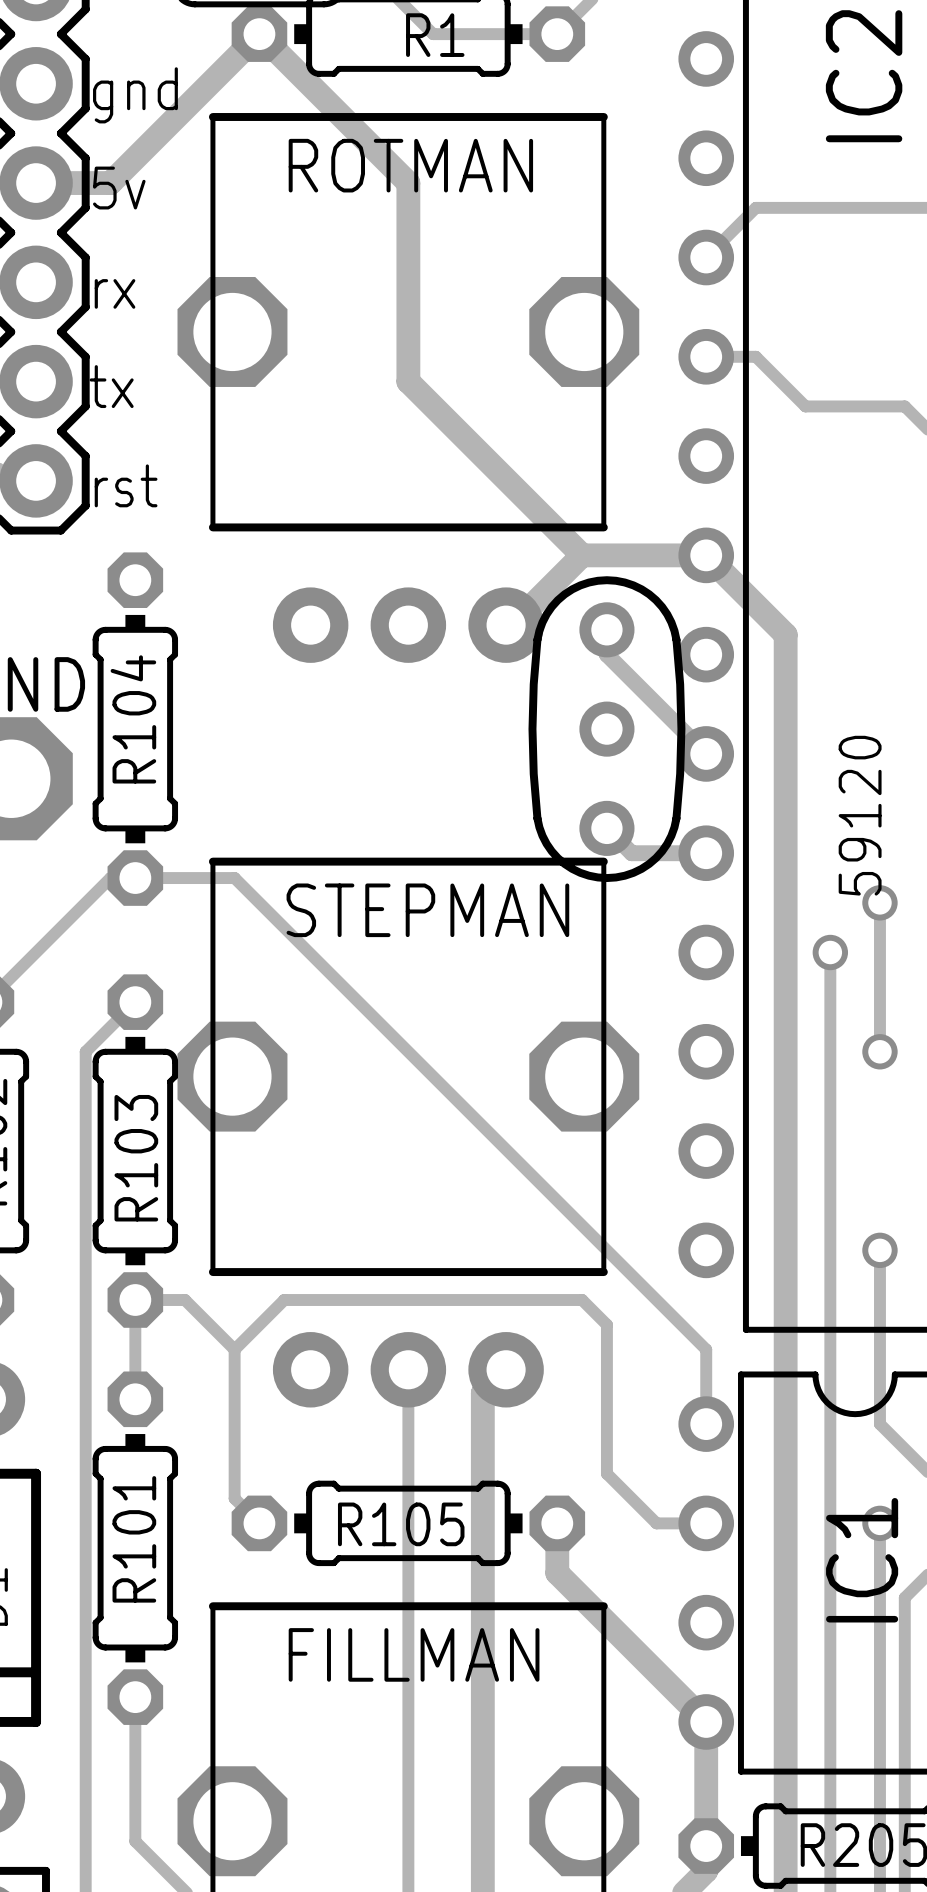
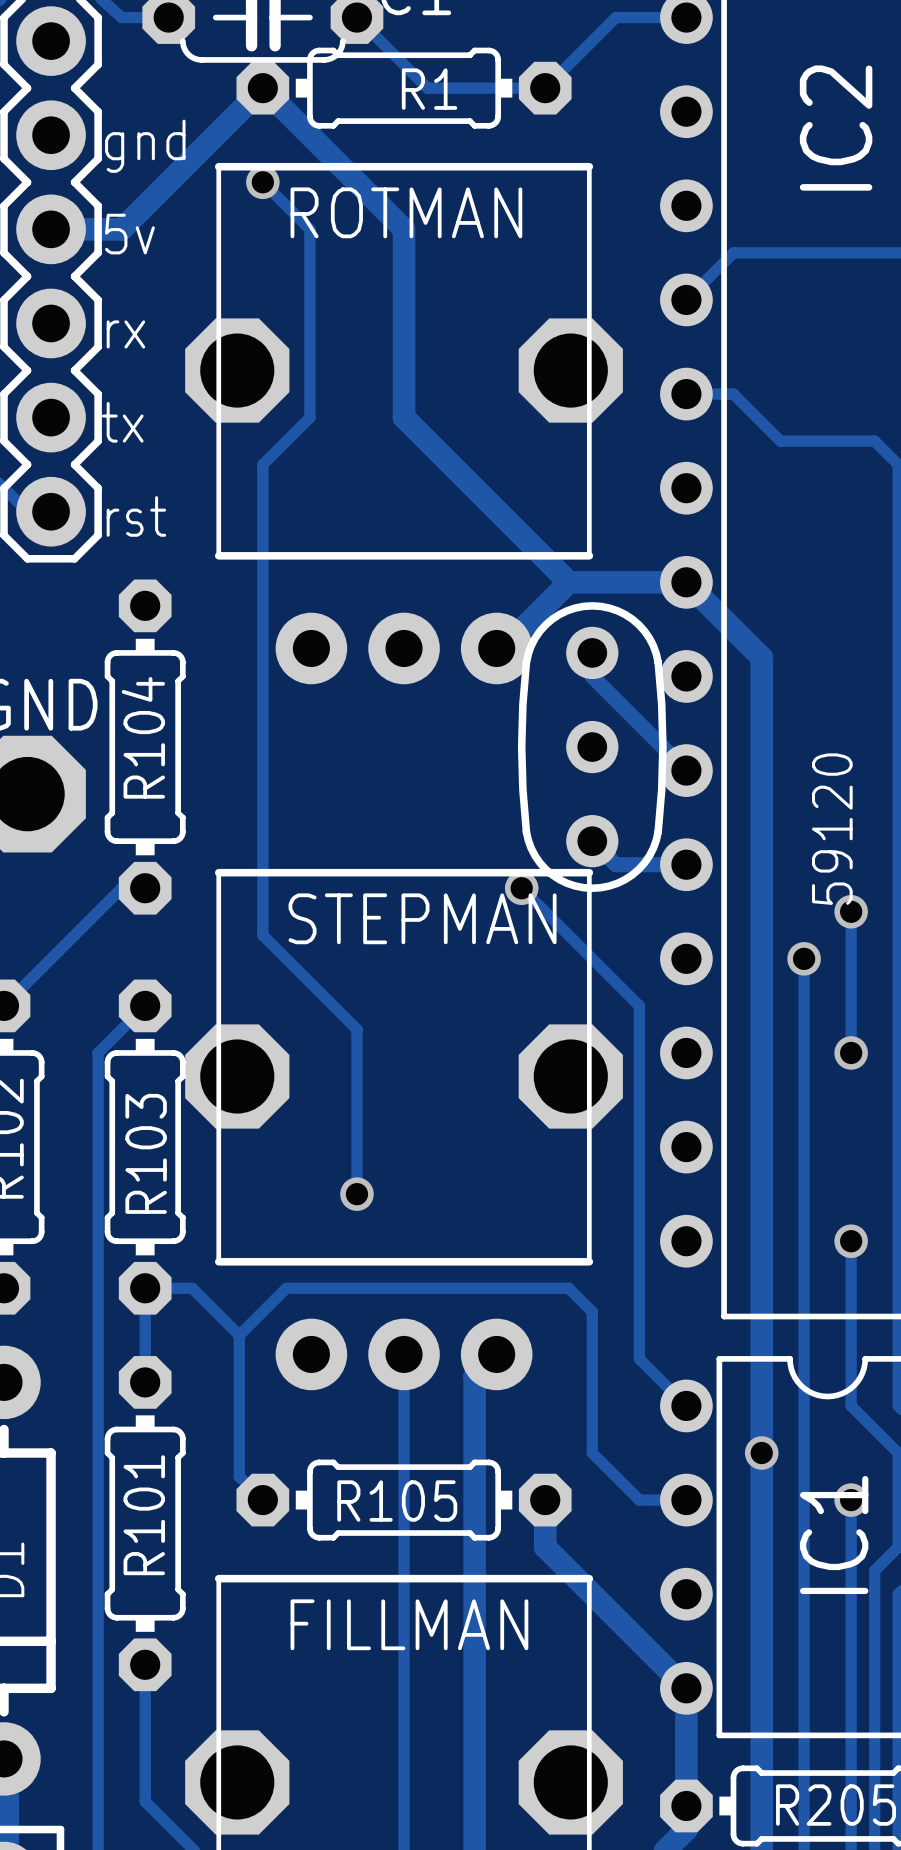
track: none -> (262, 182) (309, 229) (309, 417) (262, 464) (262, 935) (356, 1029) (356, 1194)
via: none -> (262, 182)
track: (135, 878) (234, 878) (706, 1349) (706, 1424) -> (521, 888) (639, 1005) (639, 1358) (686, 1405)
via: none -> (521, 888)
via: none -> (356, 1194)
via: none -> (761, 1453)

